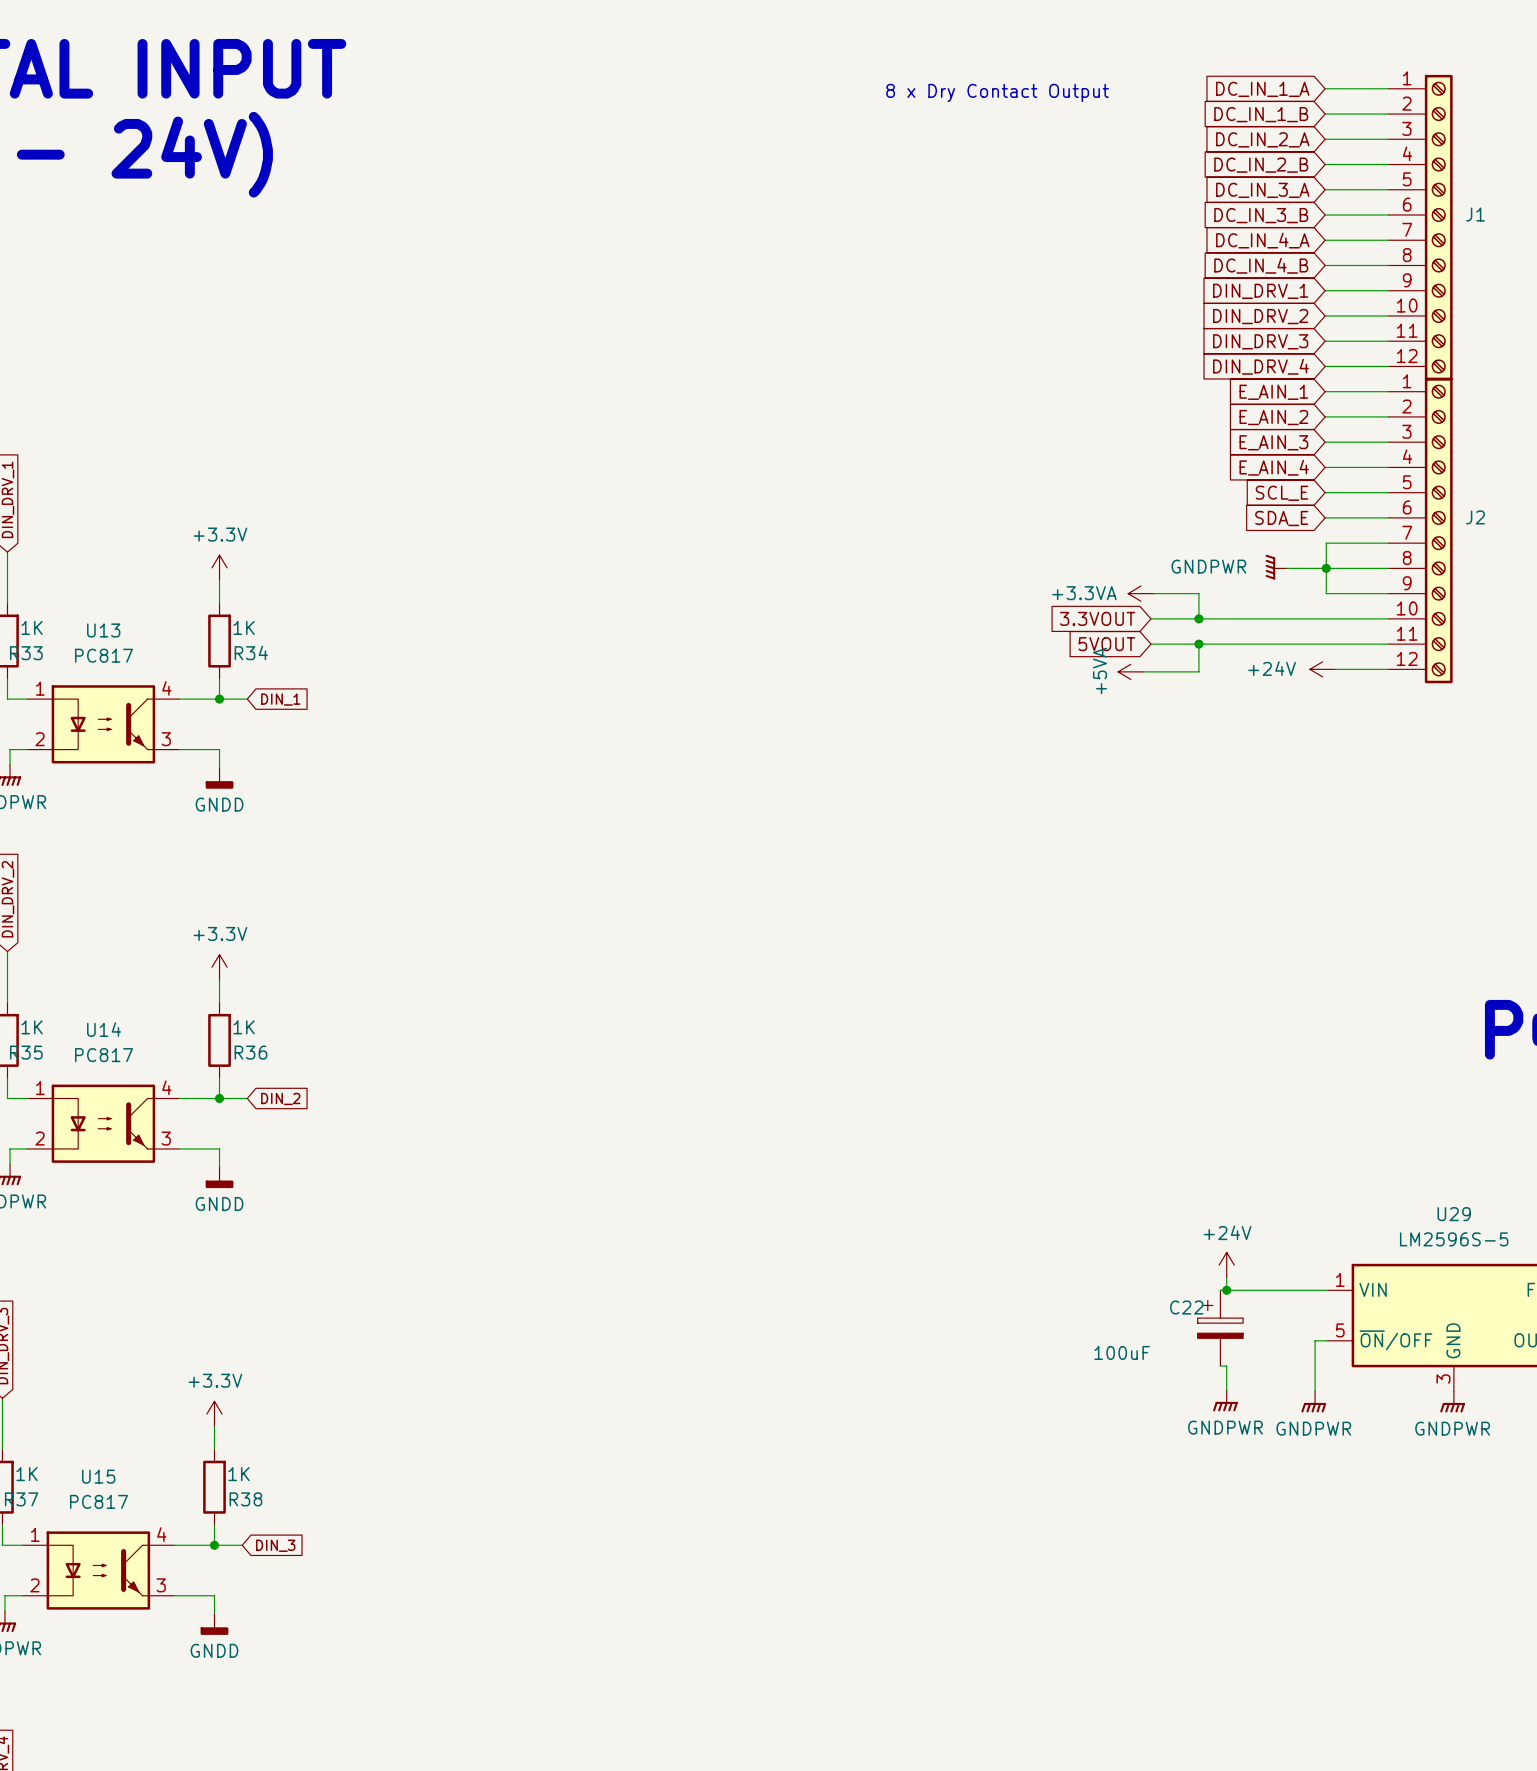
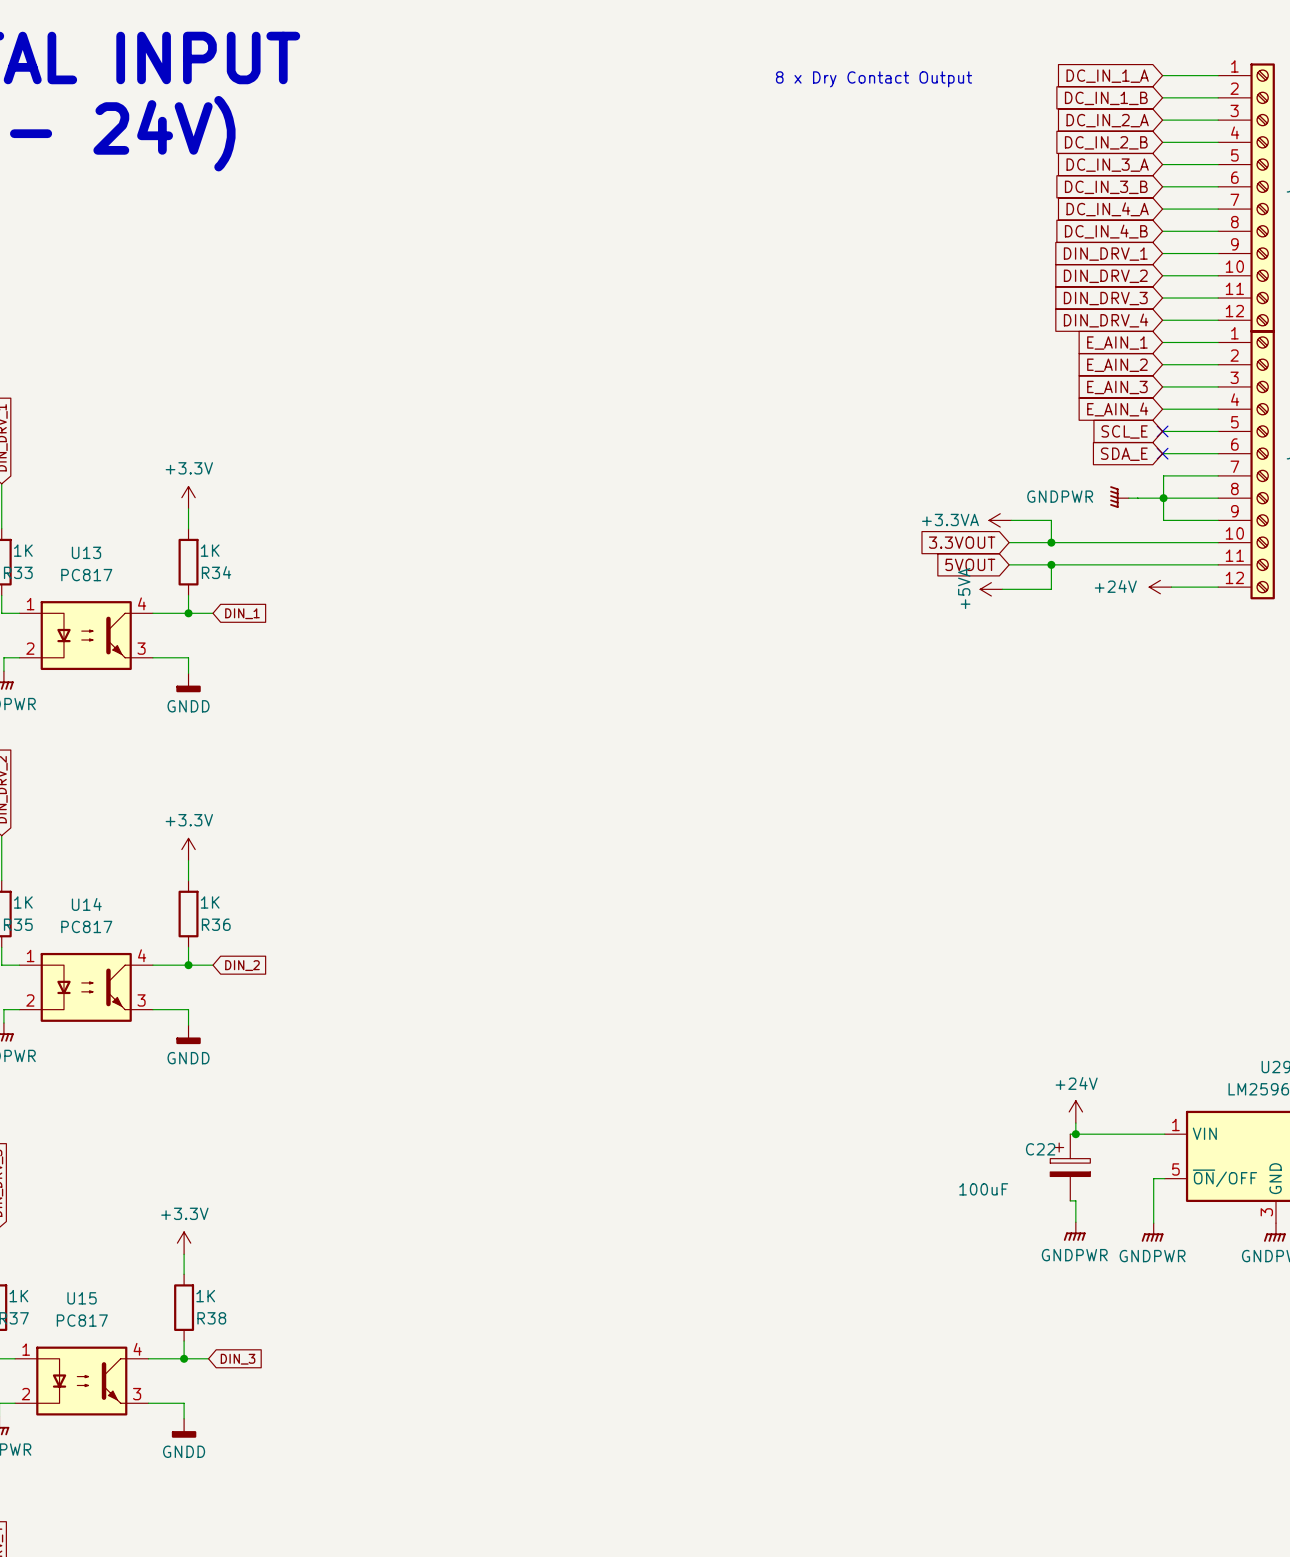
no-connect mark: none -> (1162, 431)
no-connect mark: none -> (1162, 453)

